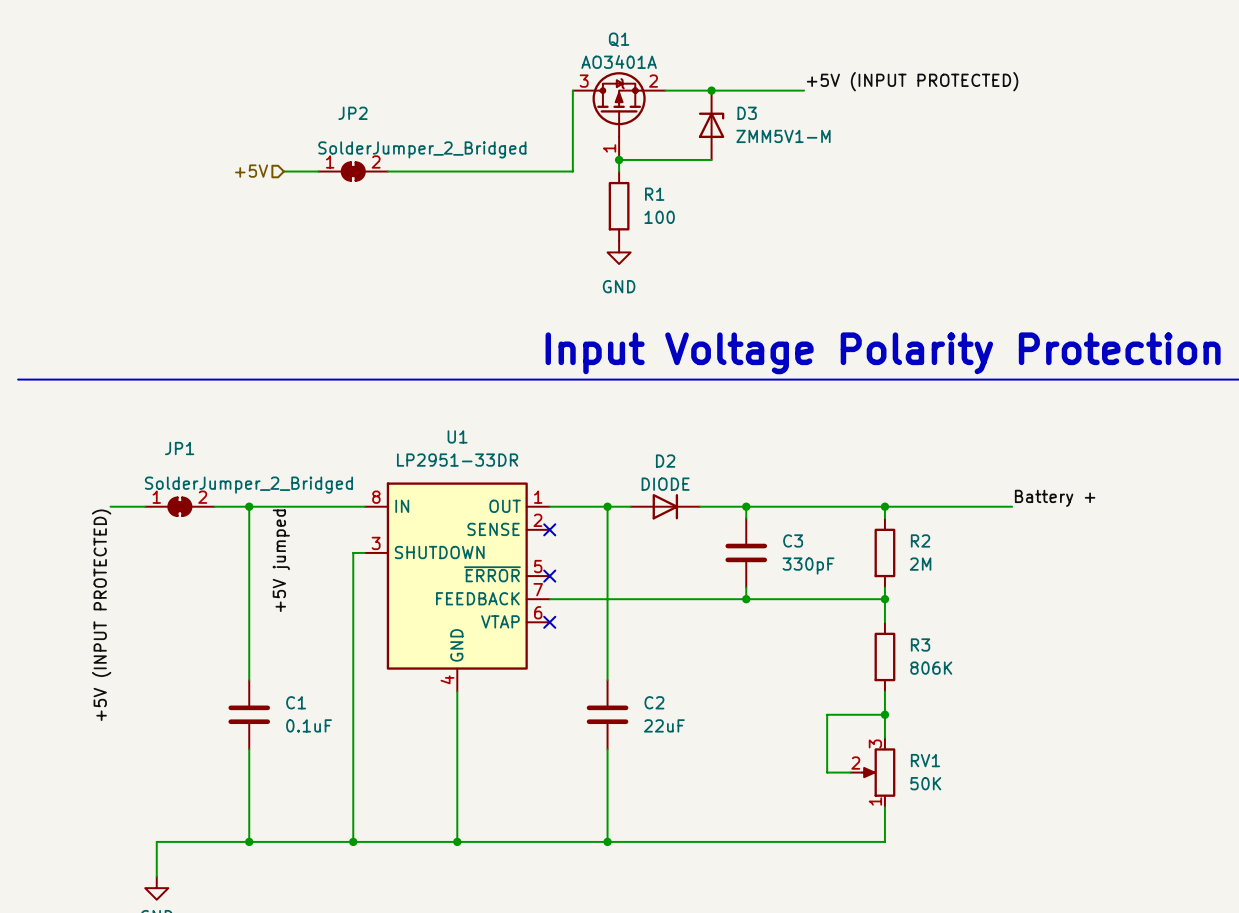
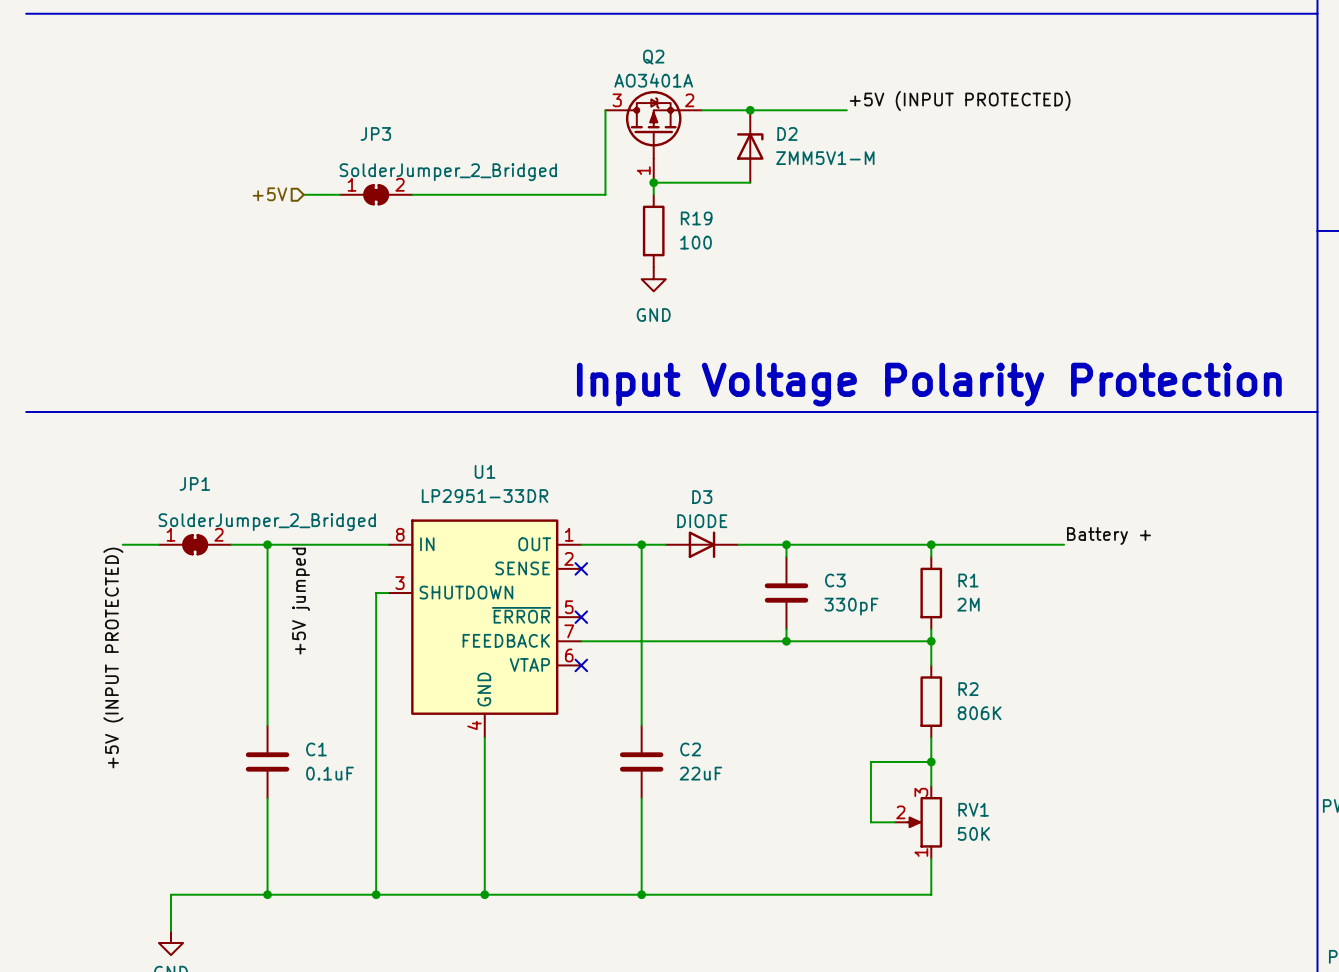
Q1 name: Q1 (619, 39) -> Q2 (653, 57)
JP2 name: JP2 (352, 113) -> JP3 (375, 133)
D3 name: D3 (747, 113) -> D2 (787, 133)
R1 name: R1 (654, 194) -> R19 (696, 218)
D2 name: D2 (665, 461) -> D3 (702, 497)
R2 name: R2 (920, 540) -> R1 (968, 580)
R3 name: R3 (920, 644) -> R2 (968, 689)

